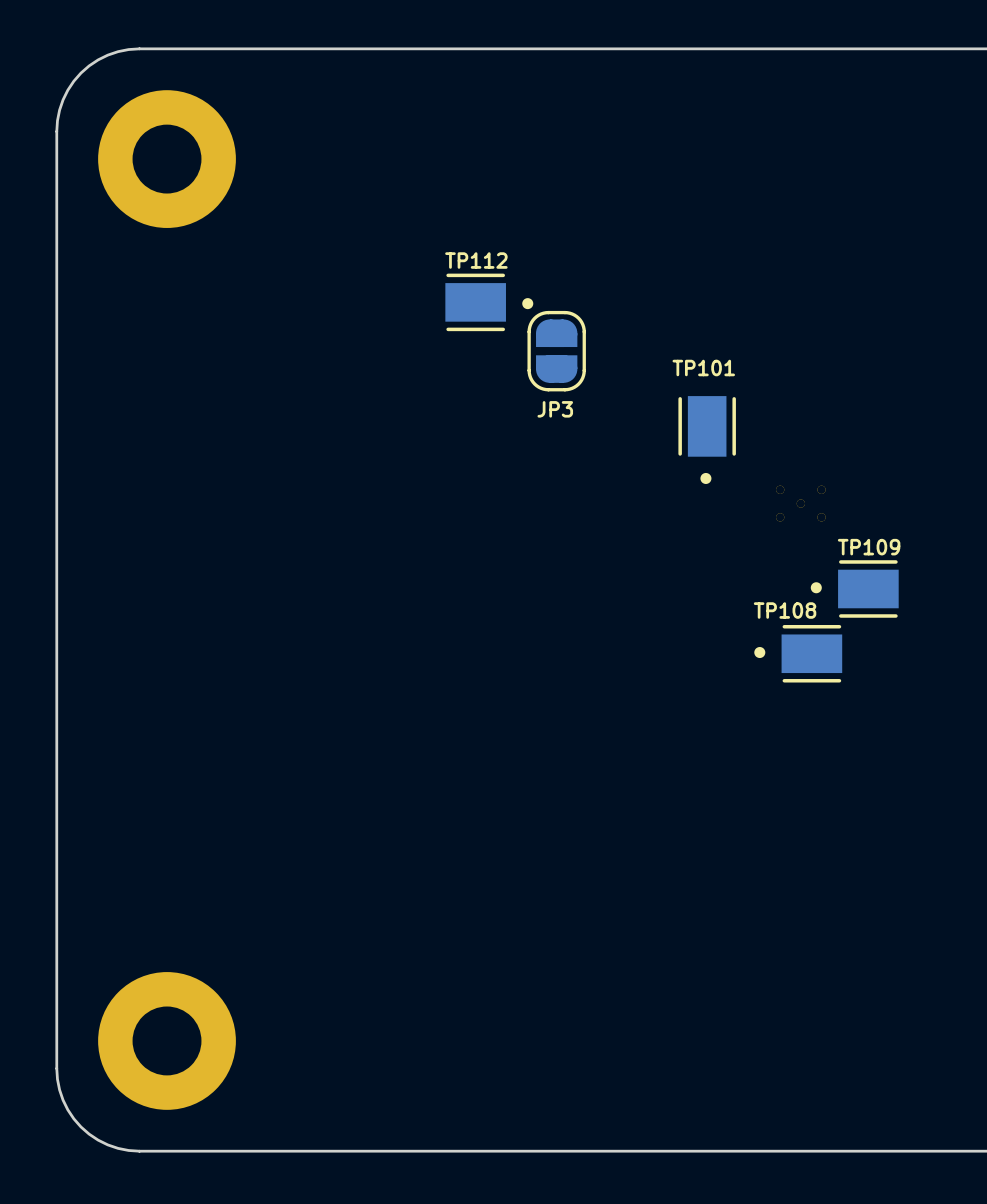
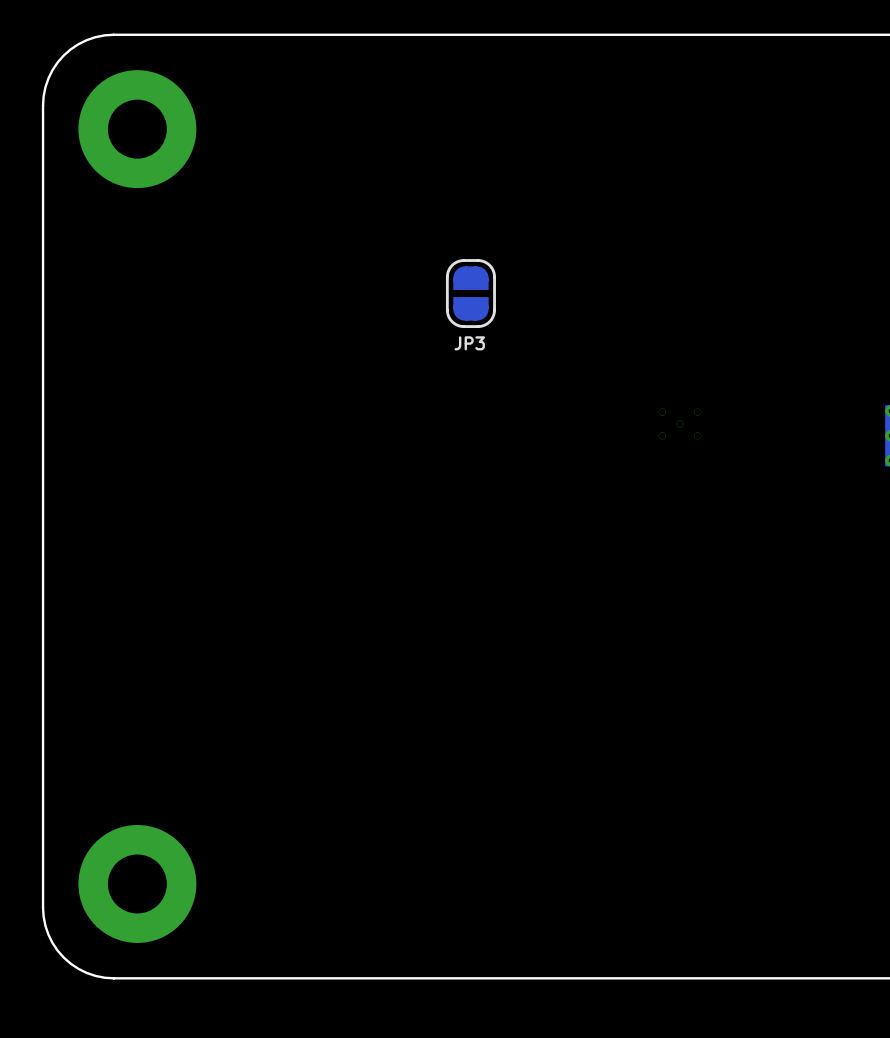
TP112: (489, 302) -> none
TP101: (707, 440) -> none
TP109: (854, 588) -> none
TP108: (798, 653) -> none

